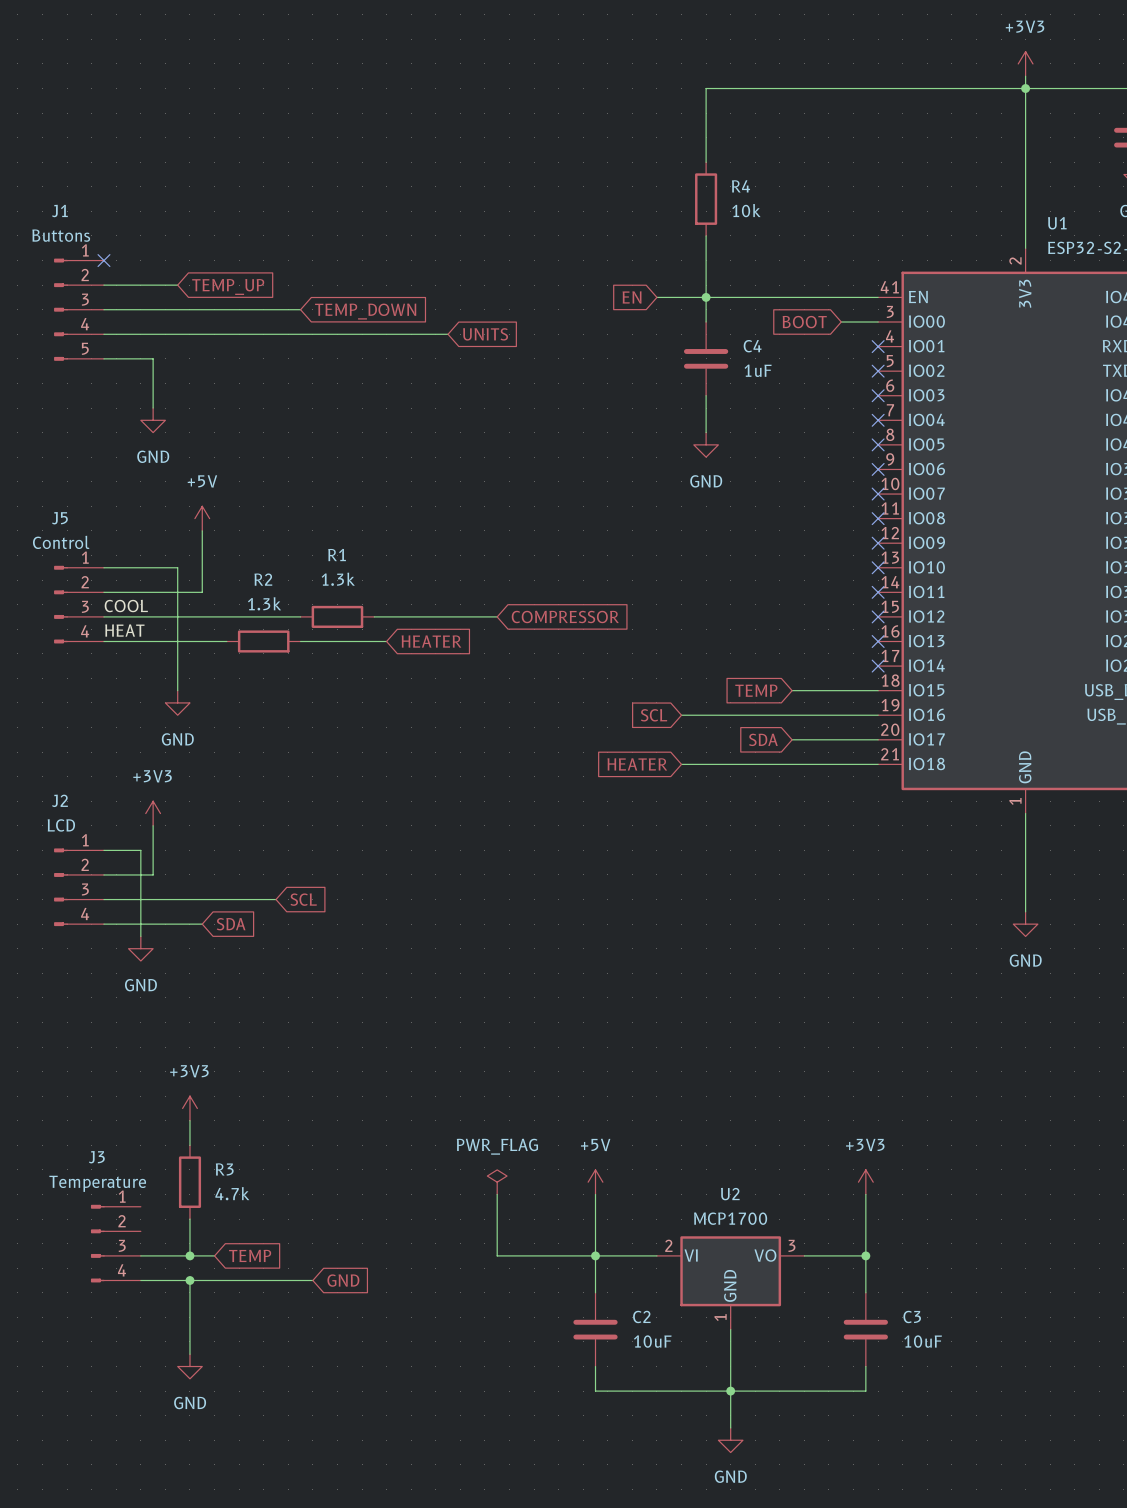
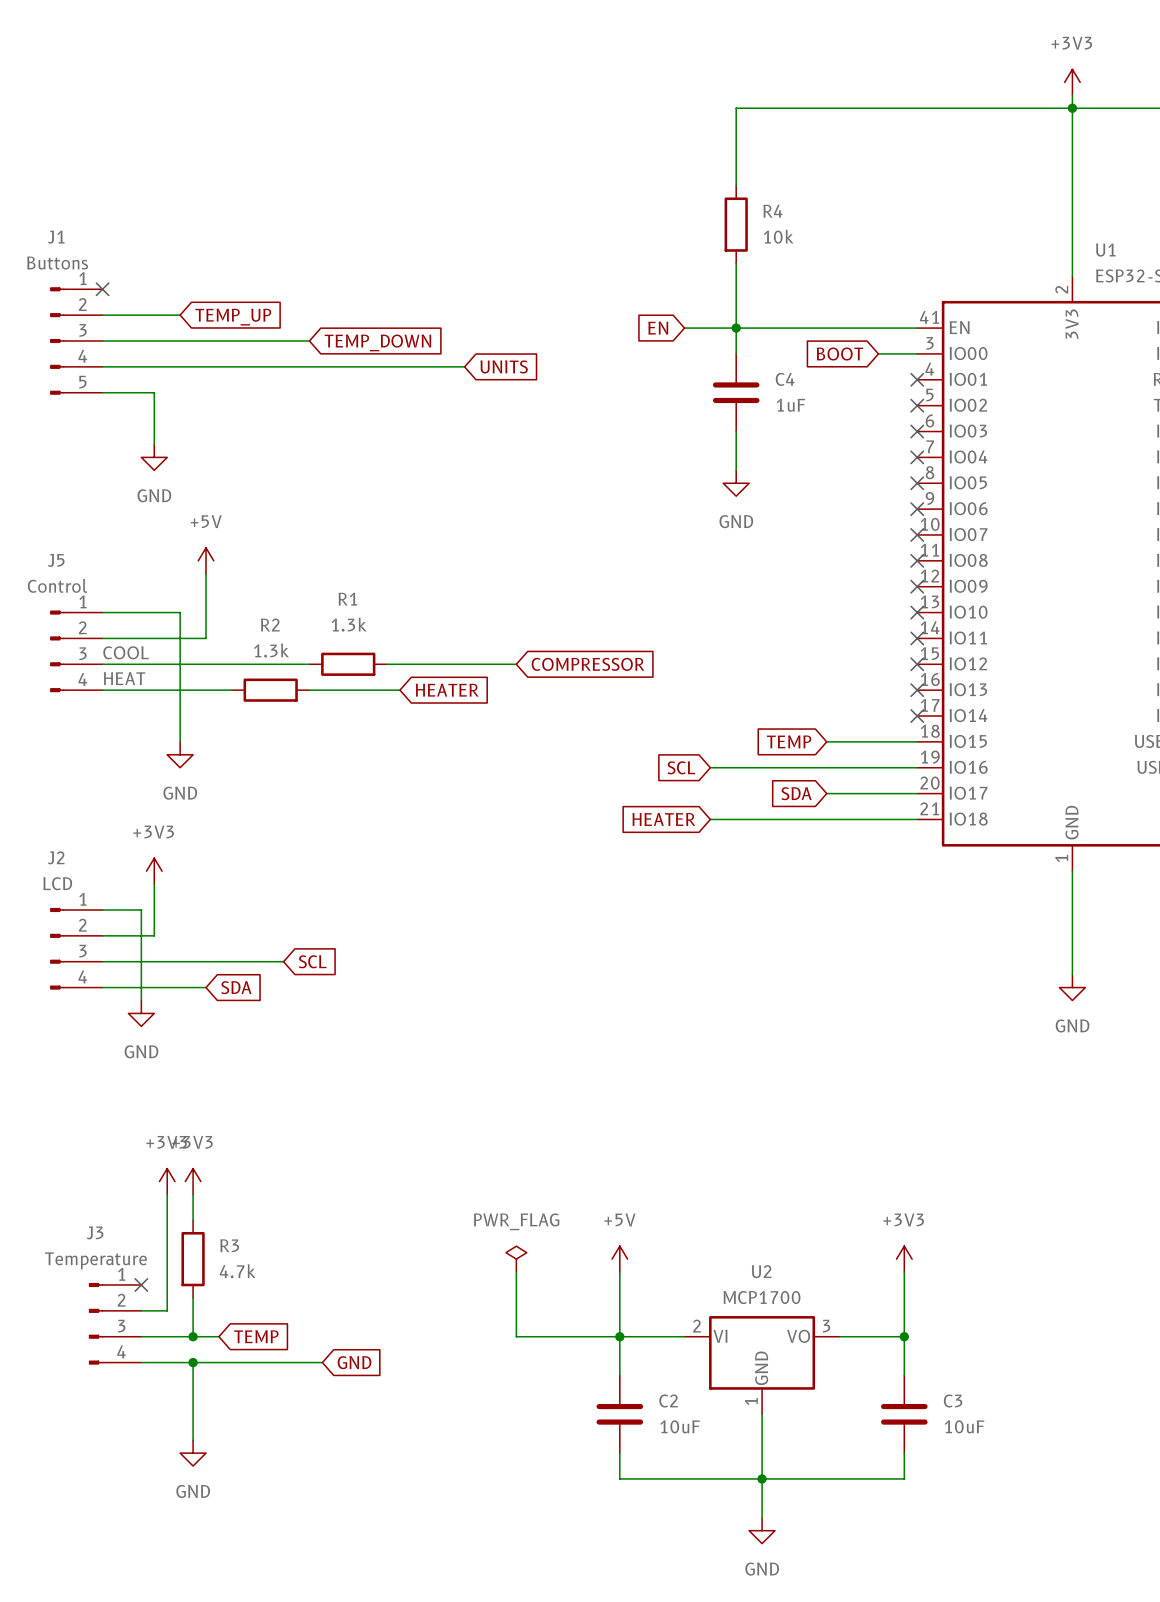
power symbol: none -> +3V3 (167, 1181)
wire: none -> (167, 1194) (167, 1310) (141, 1310)
no-connect mark: none -> (141, 1285)

